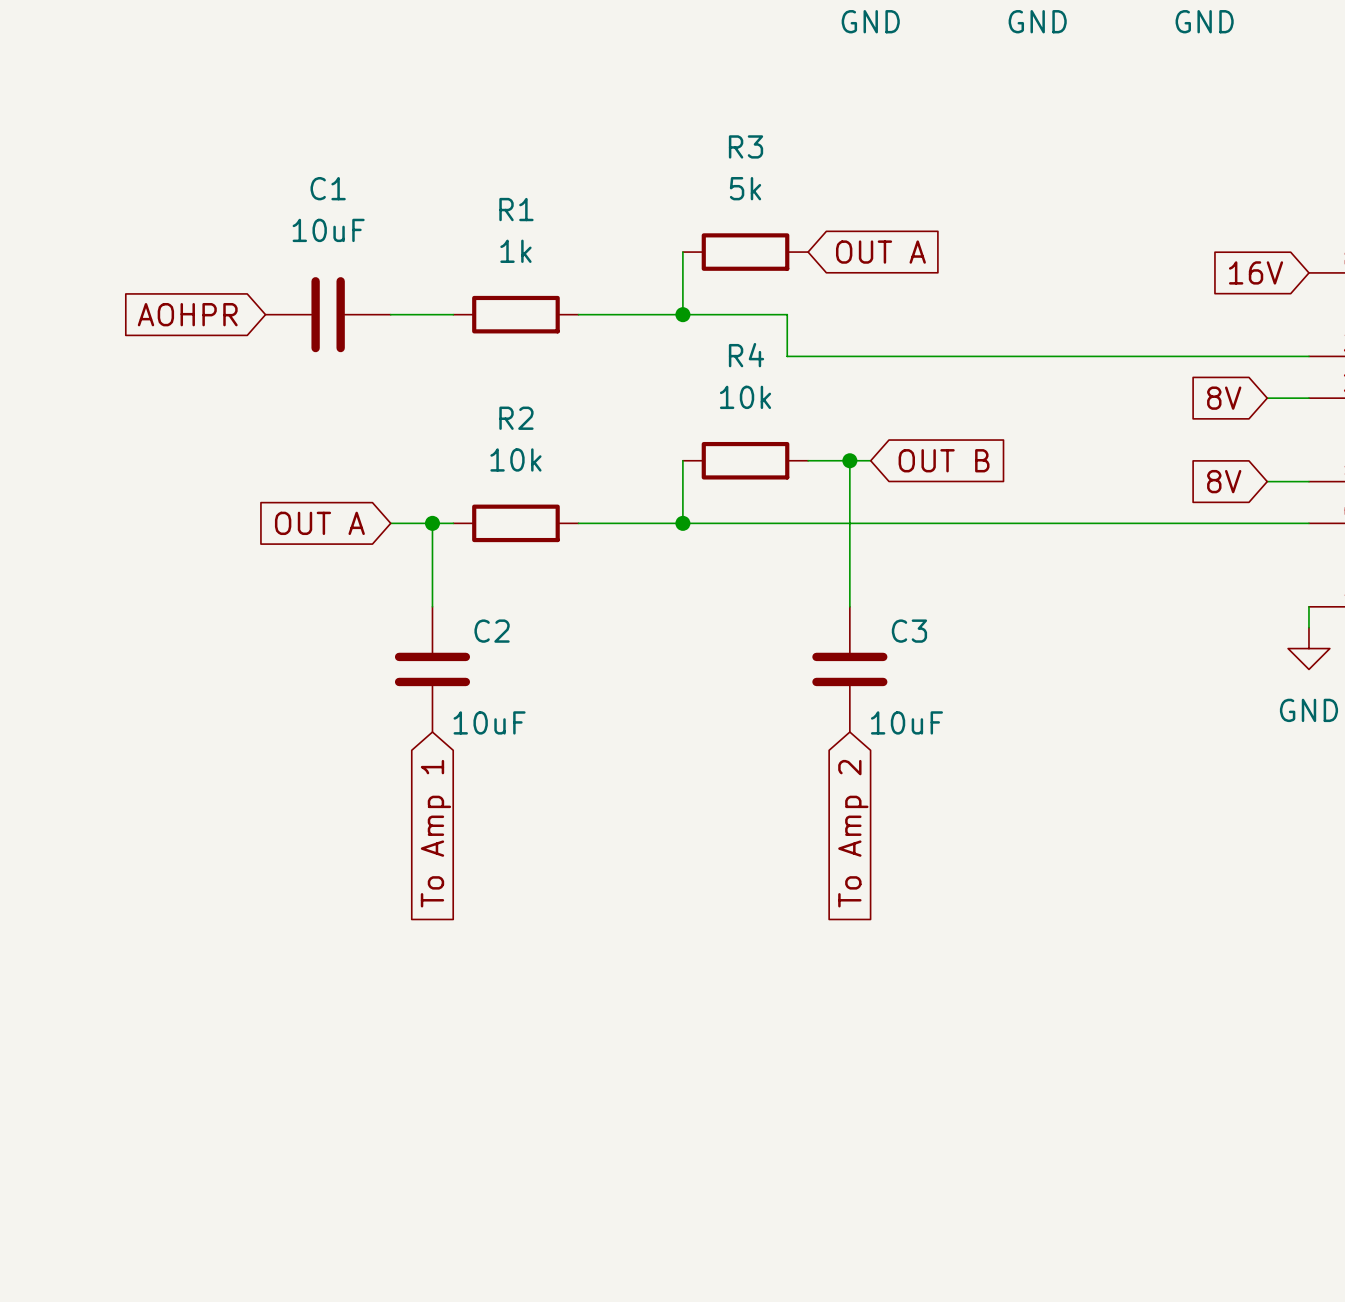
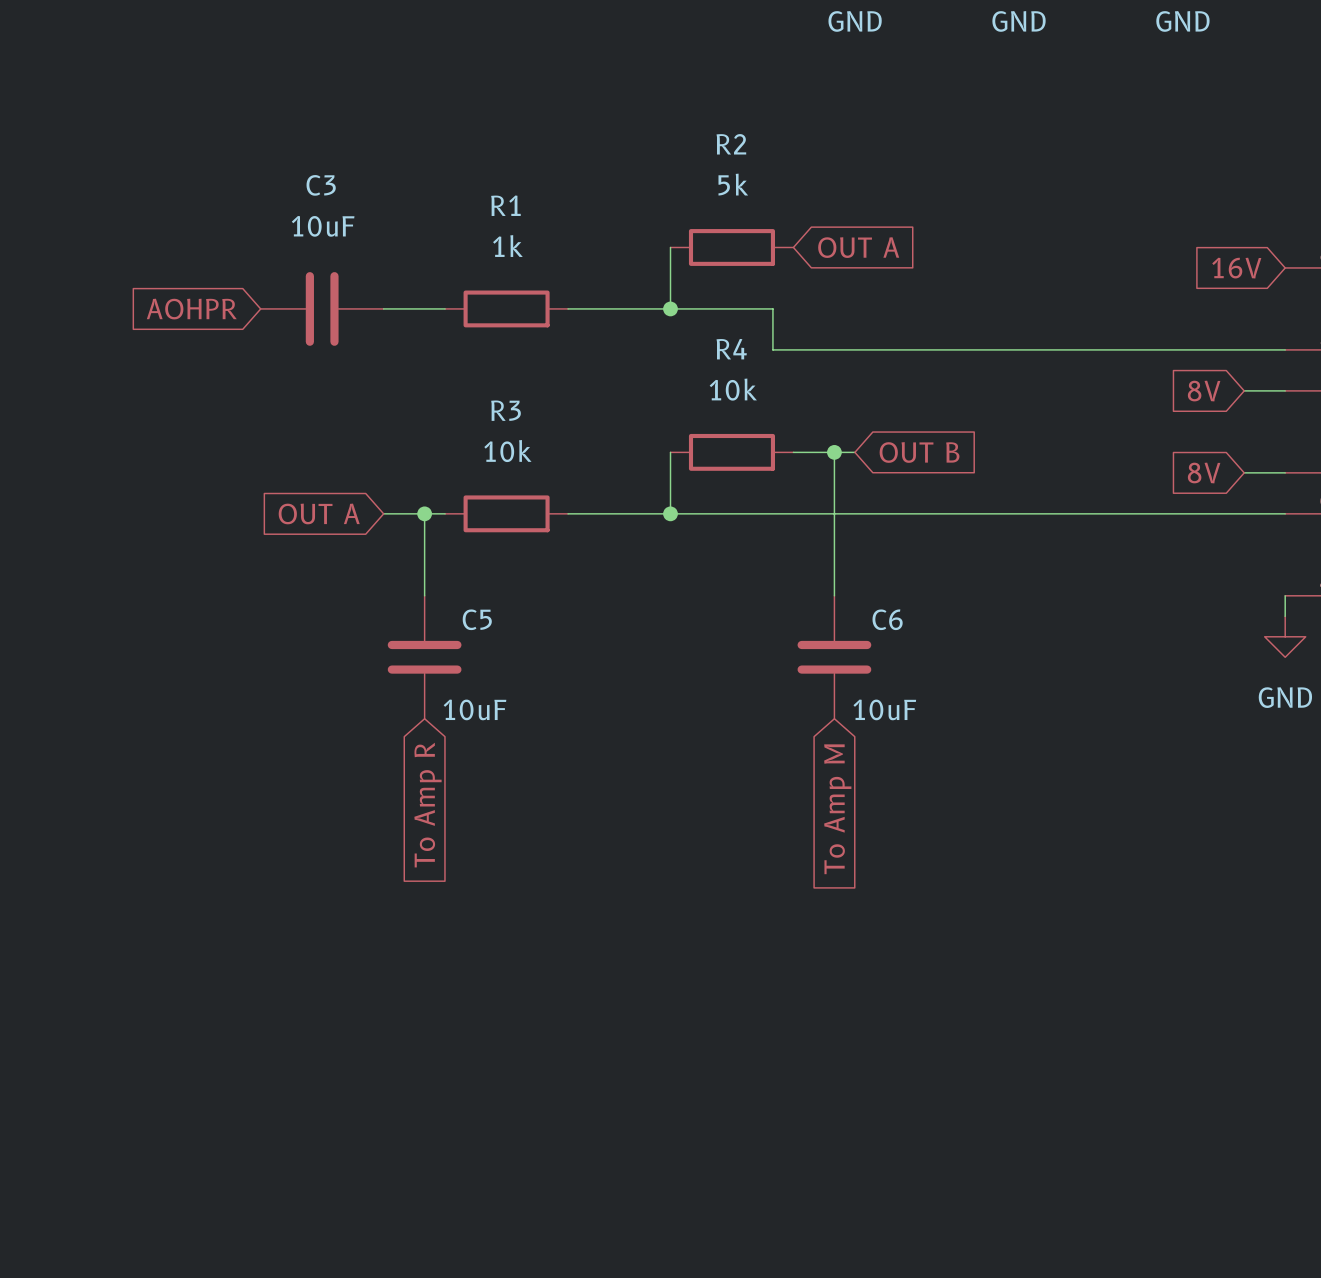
R3 name: R3 (746, 146) -> R2 (731, 144)
C1 name: C1 (328, 188) -> C3 (321, 185)
R2 name: R2 (516, 418) -> R3 (505, 410)
C2 name: C2 (492, 631) -> C5 (477, 619)
C3 name: C3 (909, 631) -> C6 (887, 619)
global label: To Amp 1 (435, 833) -> To Amp R (427, 805)
global label: To Amp 2 (853, 833) -> To Amp M (837, 809)

